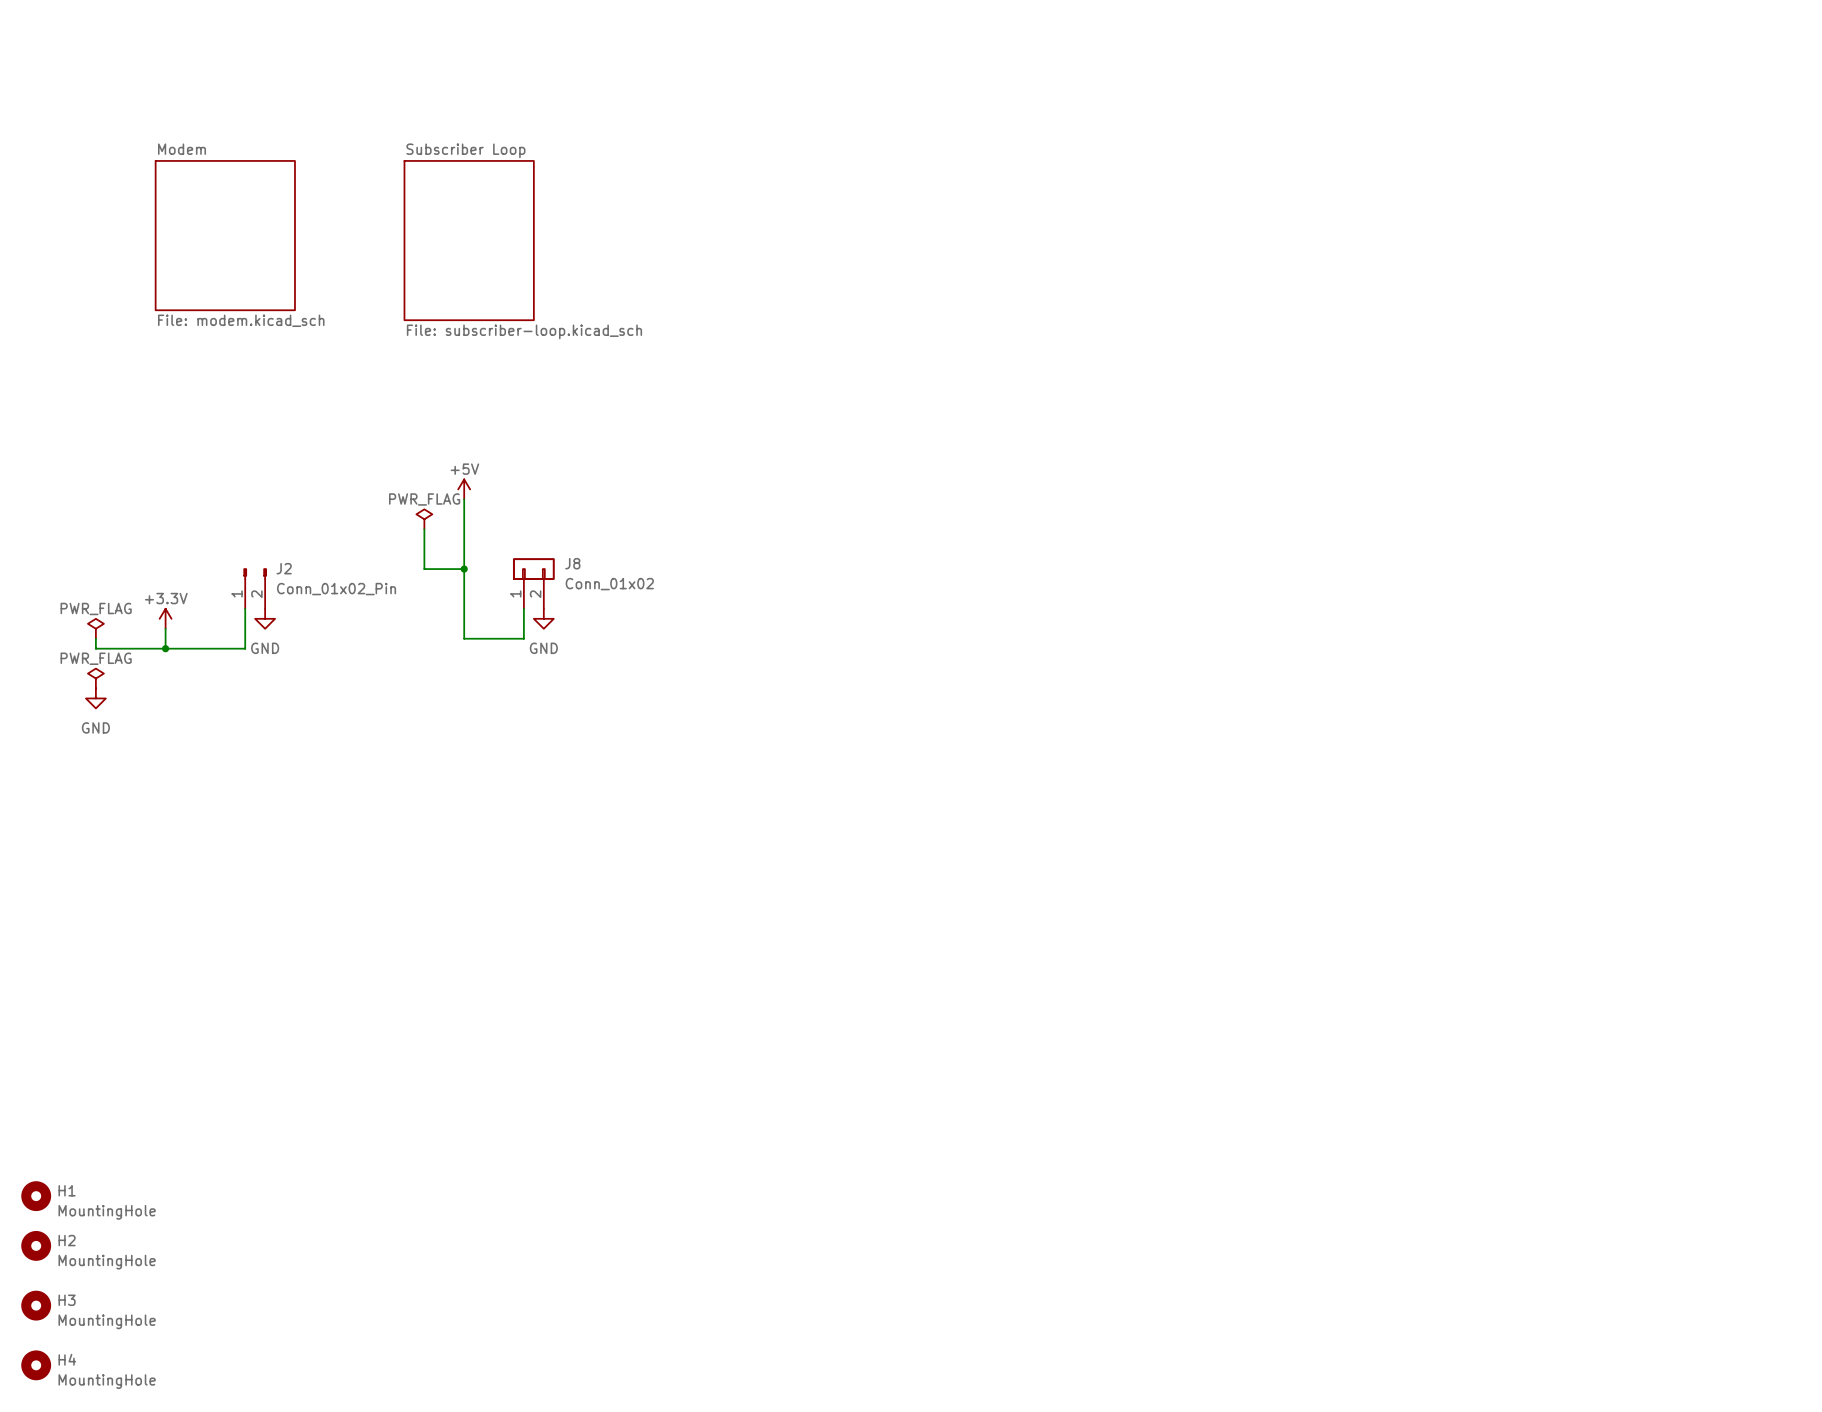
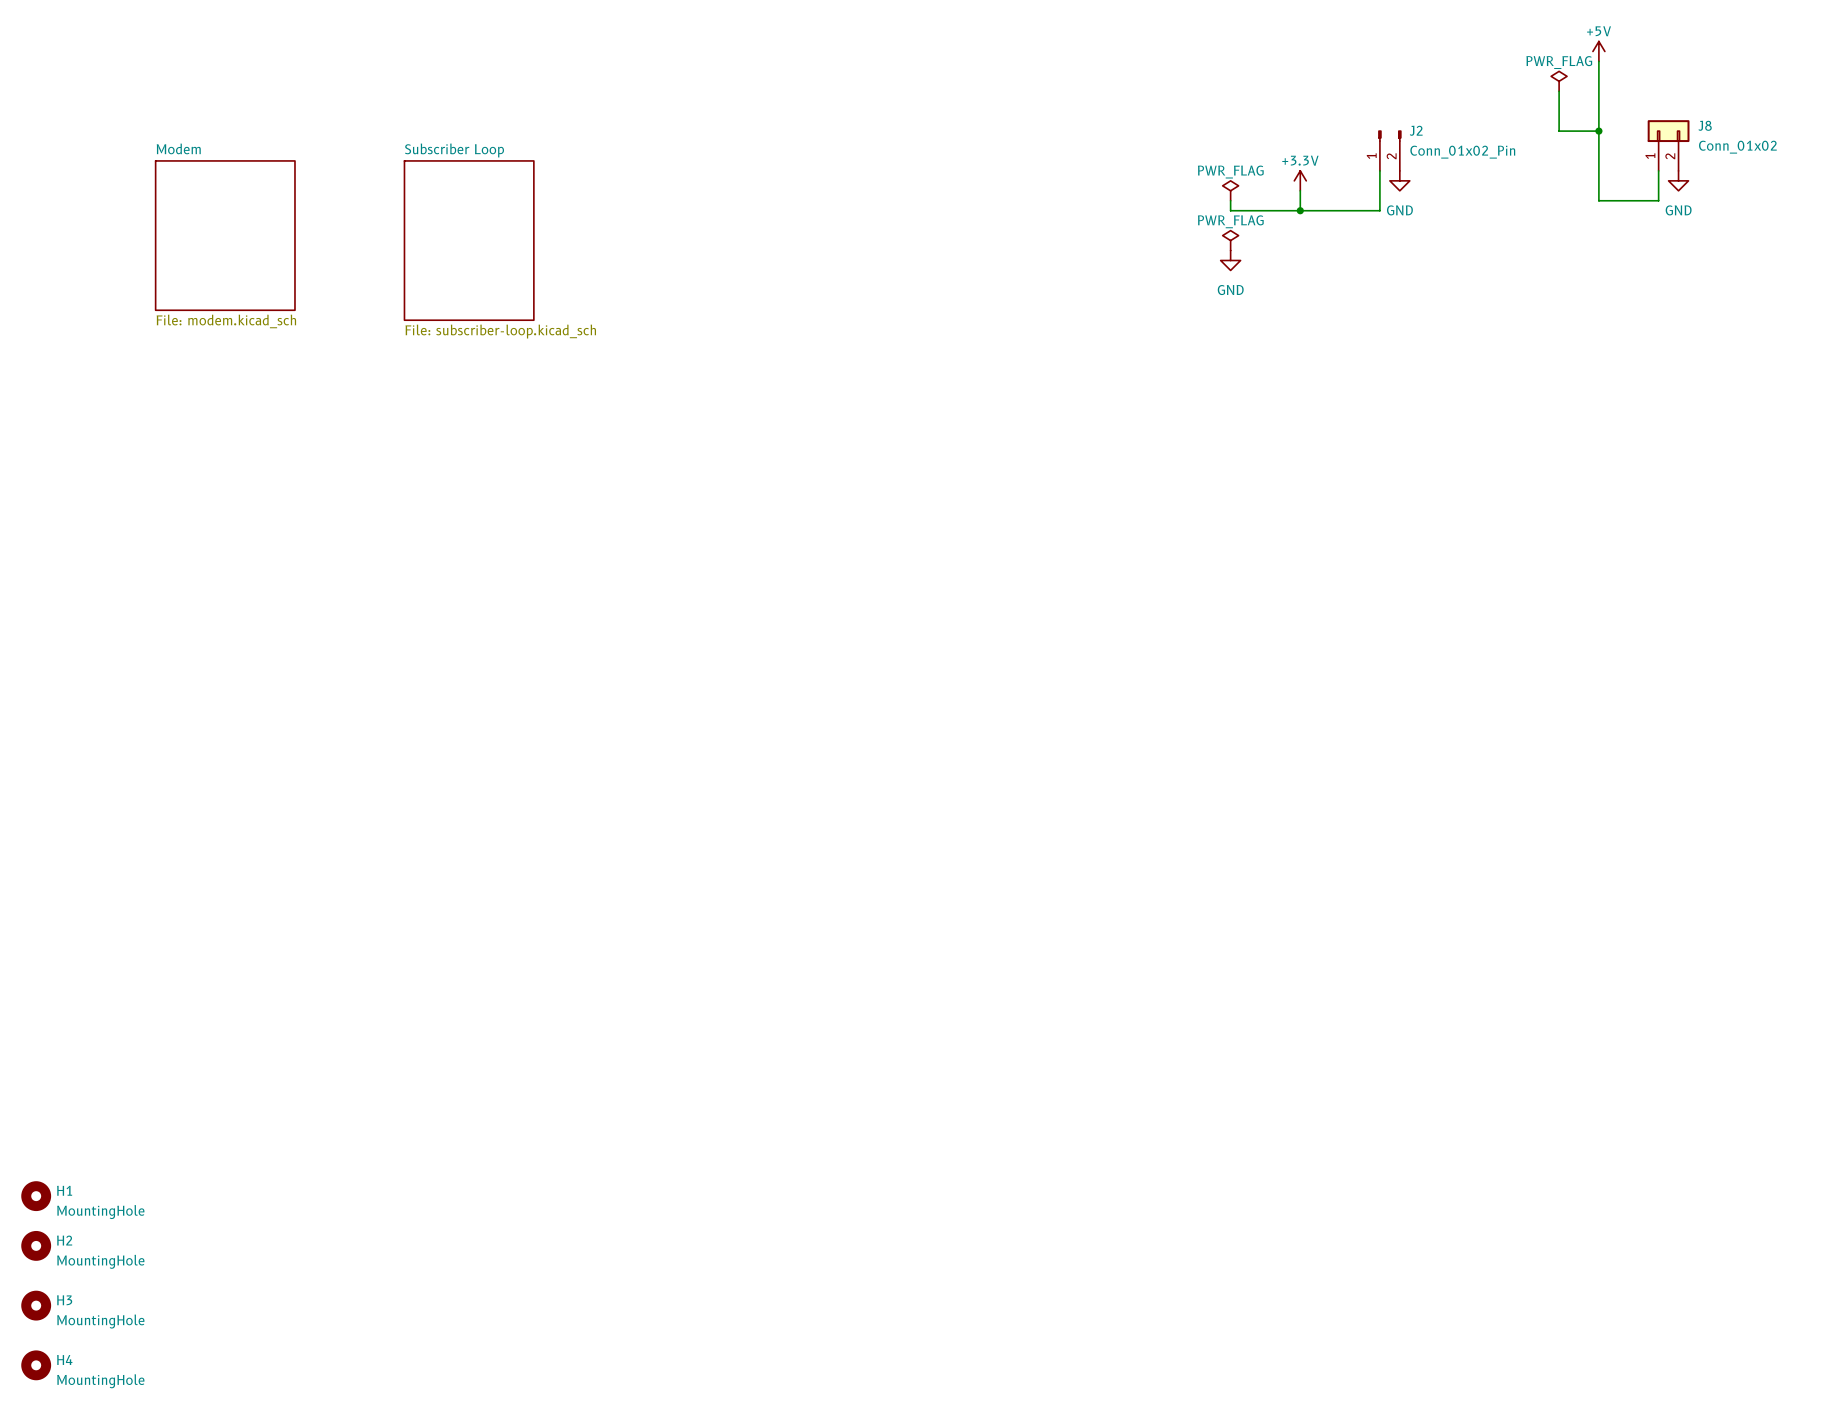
power symbol: none -> +5V (1598, 51)
wire: none -> (1598, 61) (1598, 200) (1658, 200) (1658, 170)
power symbol: none -> PWR_FLAG (1559, 81)
wire: none -> (1559, 91) (1559, 131) (1598, 131)
junction: none -> (1598, 131)
wire: none -> (1379, 170) (1379, 210) (1230, 210) (1230, 200)
power symbol: none -> +3.3V (1300, 180)
power symbol: none -> GND (1399, 180)
power symbol: none -> GND (1678, 180)
power symbol: none -> PWR_FLAG (1230, 190)
wire: none -> (1300, 190) (1300, 210)
junction: none -> (1300, 210)
power symbol: none -> PWR_FLAG (1230, 240)
power symbol: none -> GND (1230, 260)
power symbol: +5V (464, 489) -> none
wire: (464, 499) (464, 638) (523, 638) (523, 608) -> none
power symbol: PWR_FLAG (424, 519) -> none
wire: (424, 529) (424, 569) (464, 569) -> none
junction: (464, 569) -> none
J8 position: (533, 583) -> (1668, 145)
J2 position: (255, 588) -> (1389, 150)
wire: (245, 608) (245, 648) (95, 648) (95, 638) -> none
power symbol: +3.3V (165, 618) -> none
power symbol: GND (265, 618) -> none
power symbol: GND (543, 618) -> none
power symbol: PWR_FLAG (95, 628) -> none
wire: (165, 628) (165, 648) -> none
junction: (165, 648) -> none
power symbol: PWR_FLAG (95, 678) -> none
power symbol: GND (95, 698) -> none

